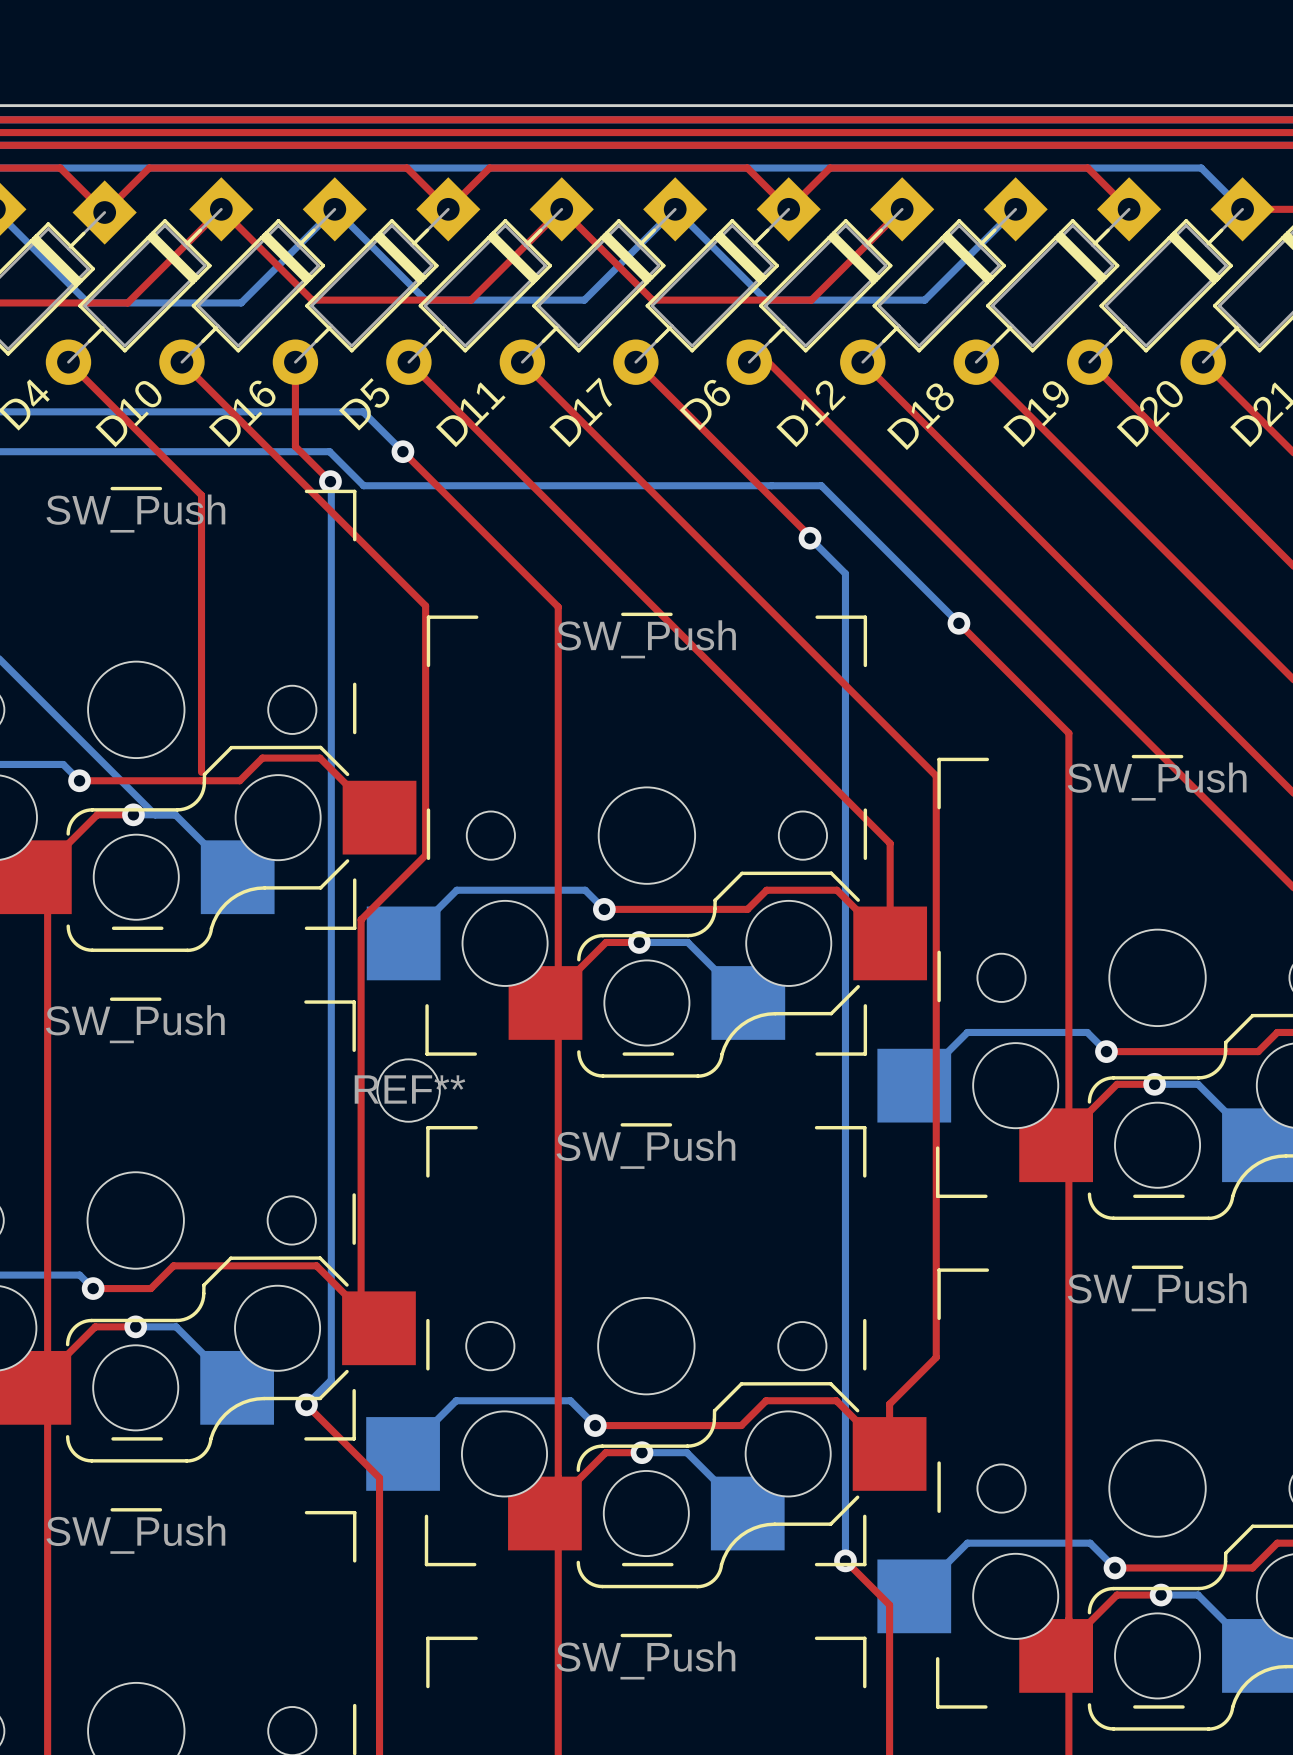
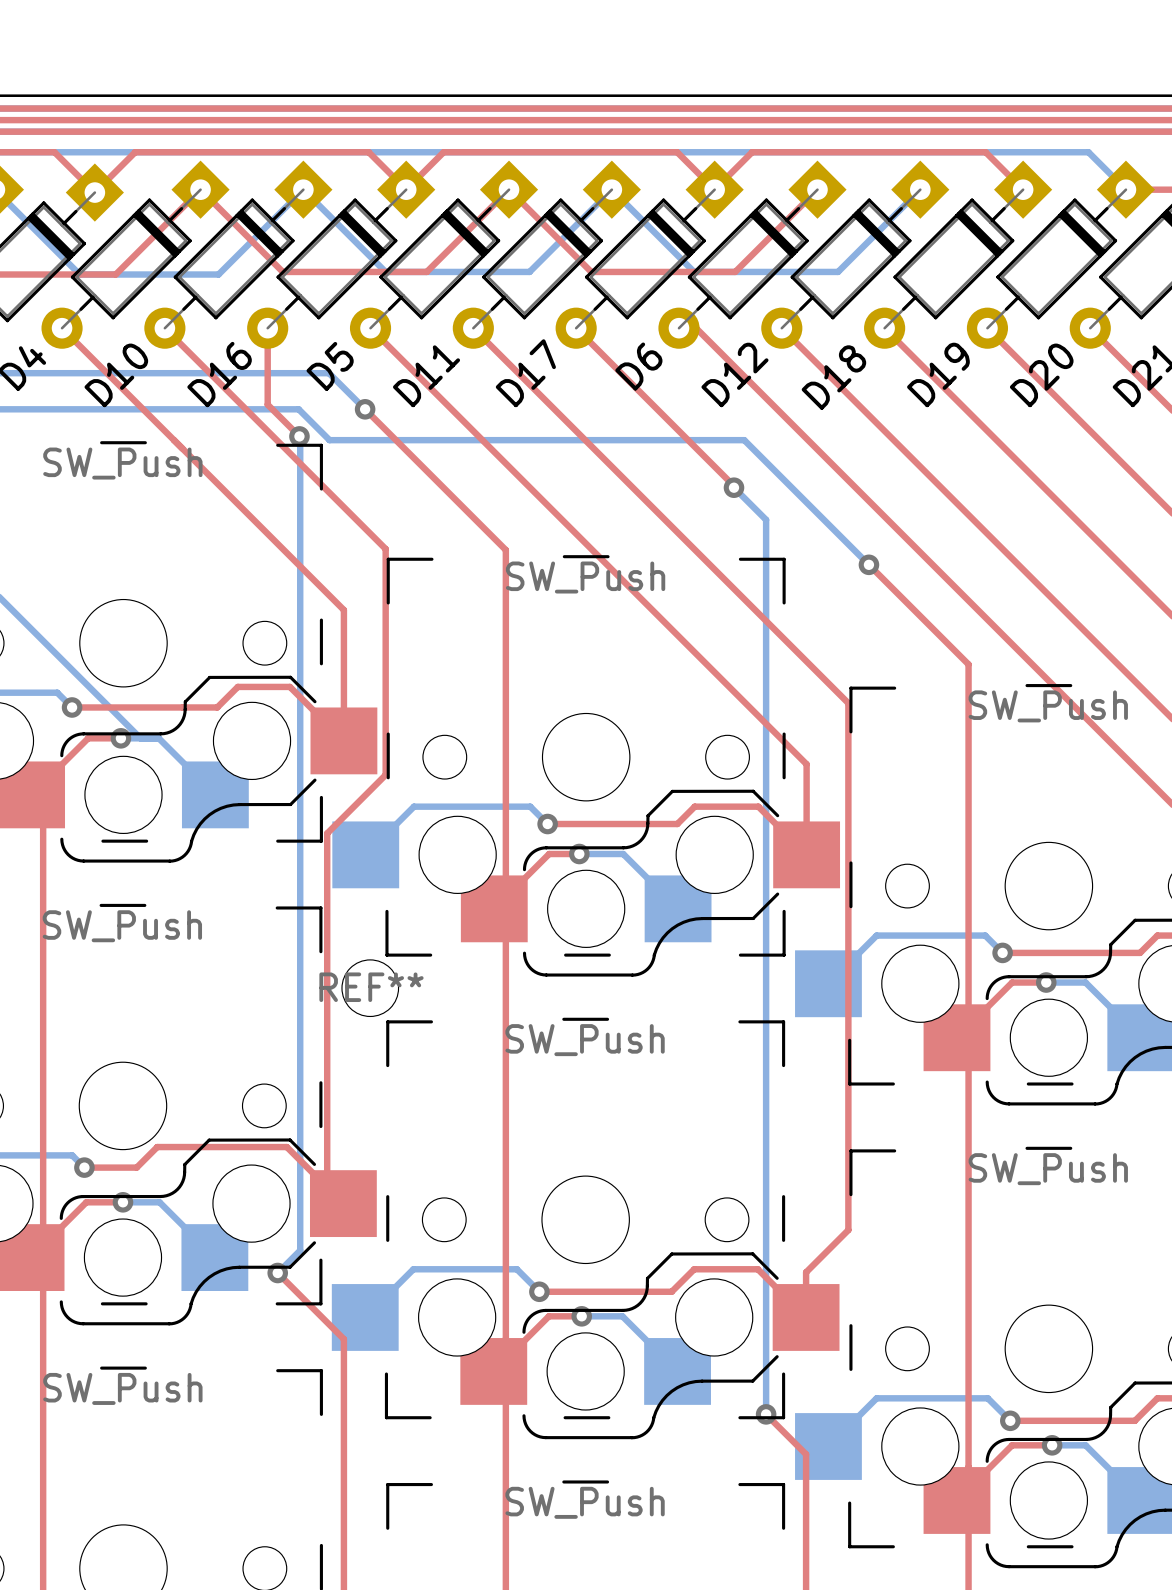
top track: (201, 495) (201, 772) -> (182, 448) (343, 610) (343, 740)

